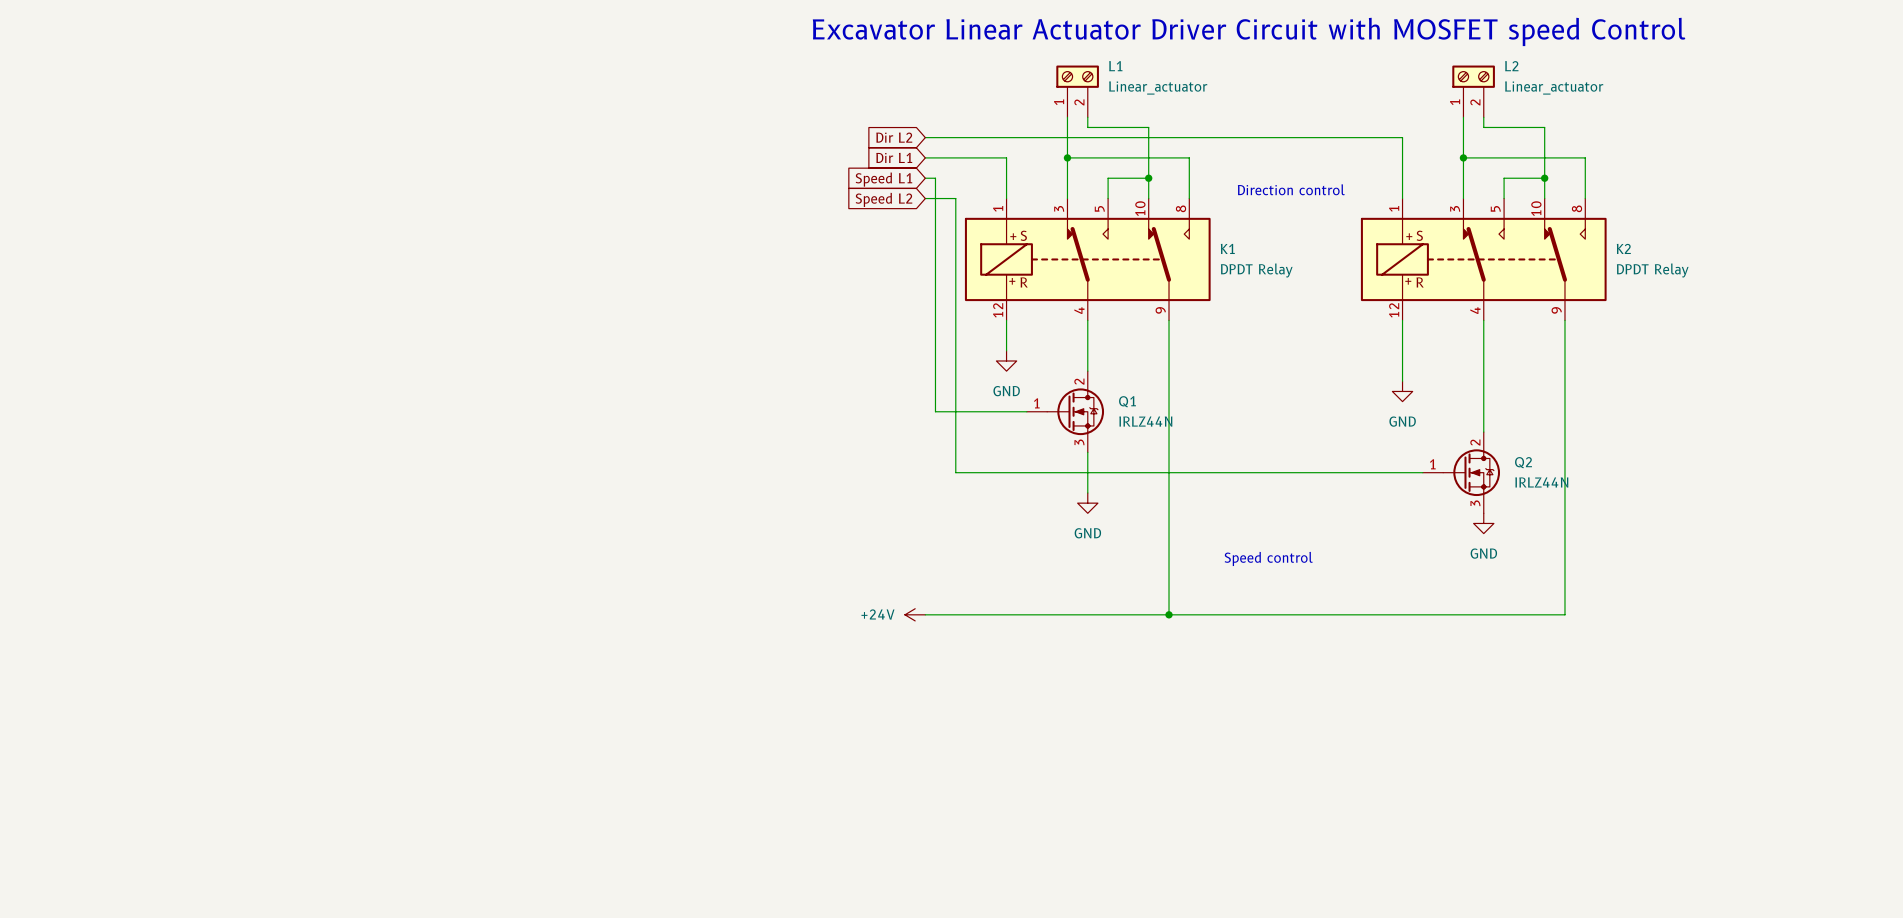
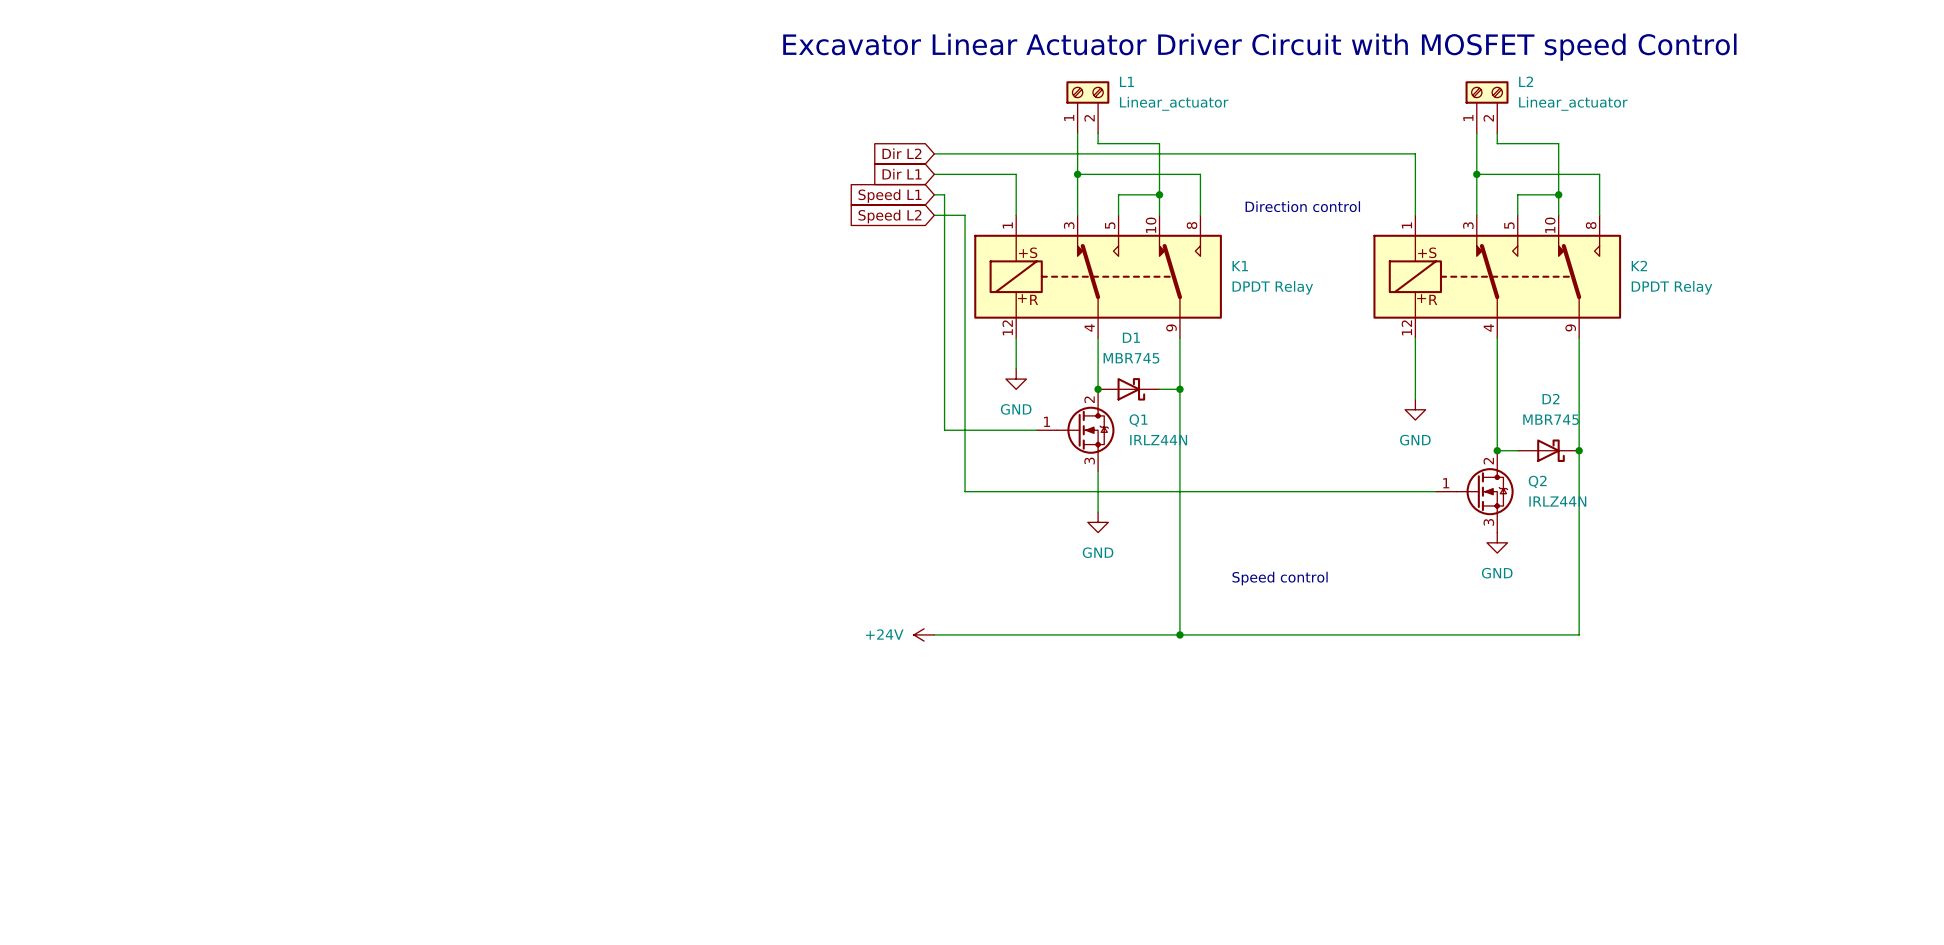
junction: none -> (1098, 389)
D1: none -> MBR745 (1128, 389)
wire: none -> (1159, 389) (1179, 389)
junction: none -> (1179, 389)
wire: none -> (1497, 450) (1517, 450)
junction: none -> (1497, 450)
D2: none -> MBR745 (1548, 450)
junction: none -> (1579, 450)

